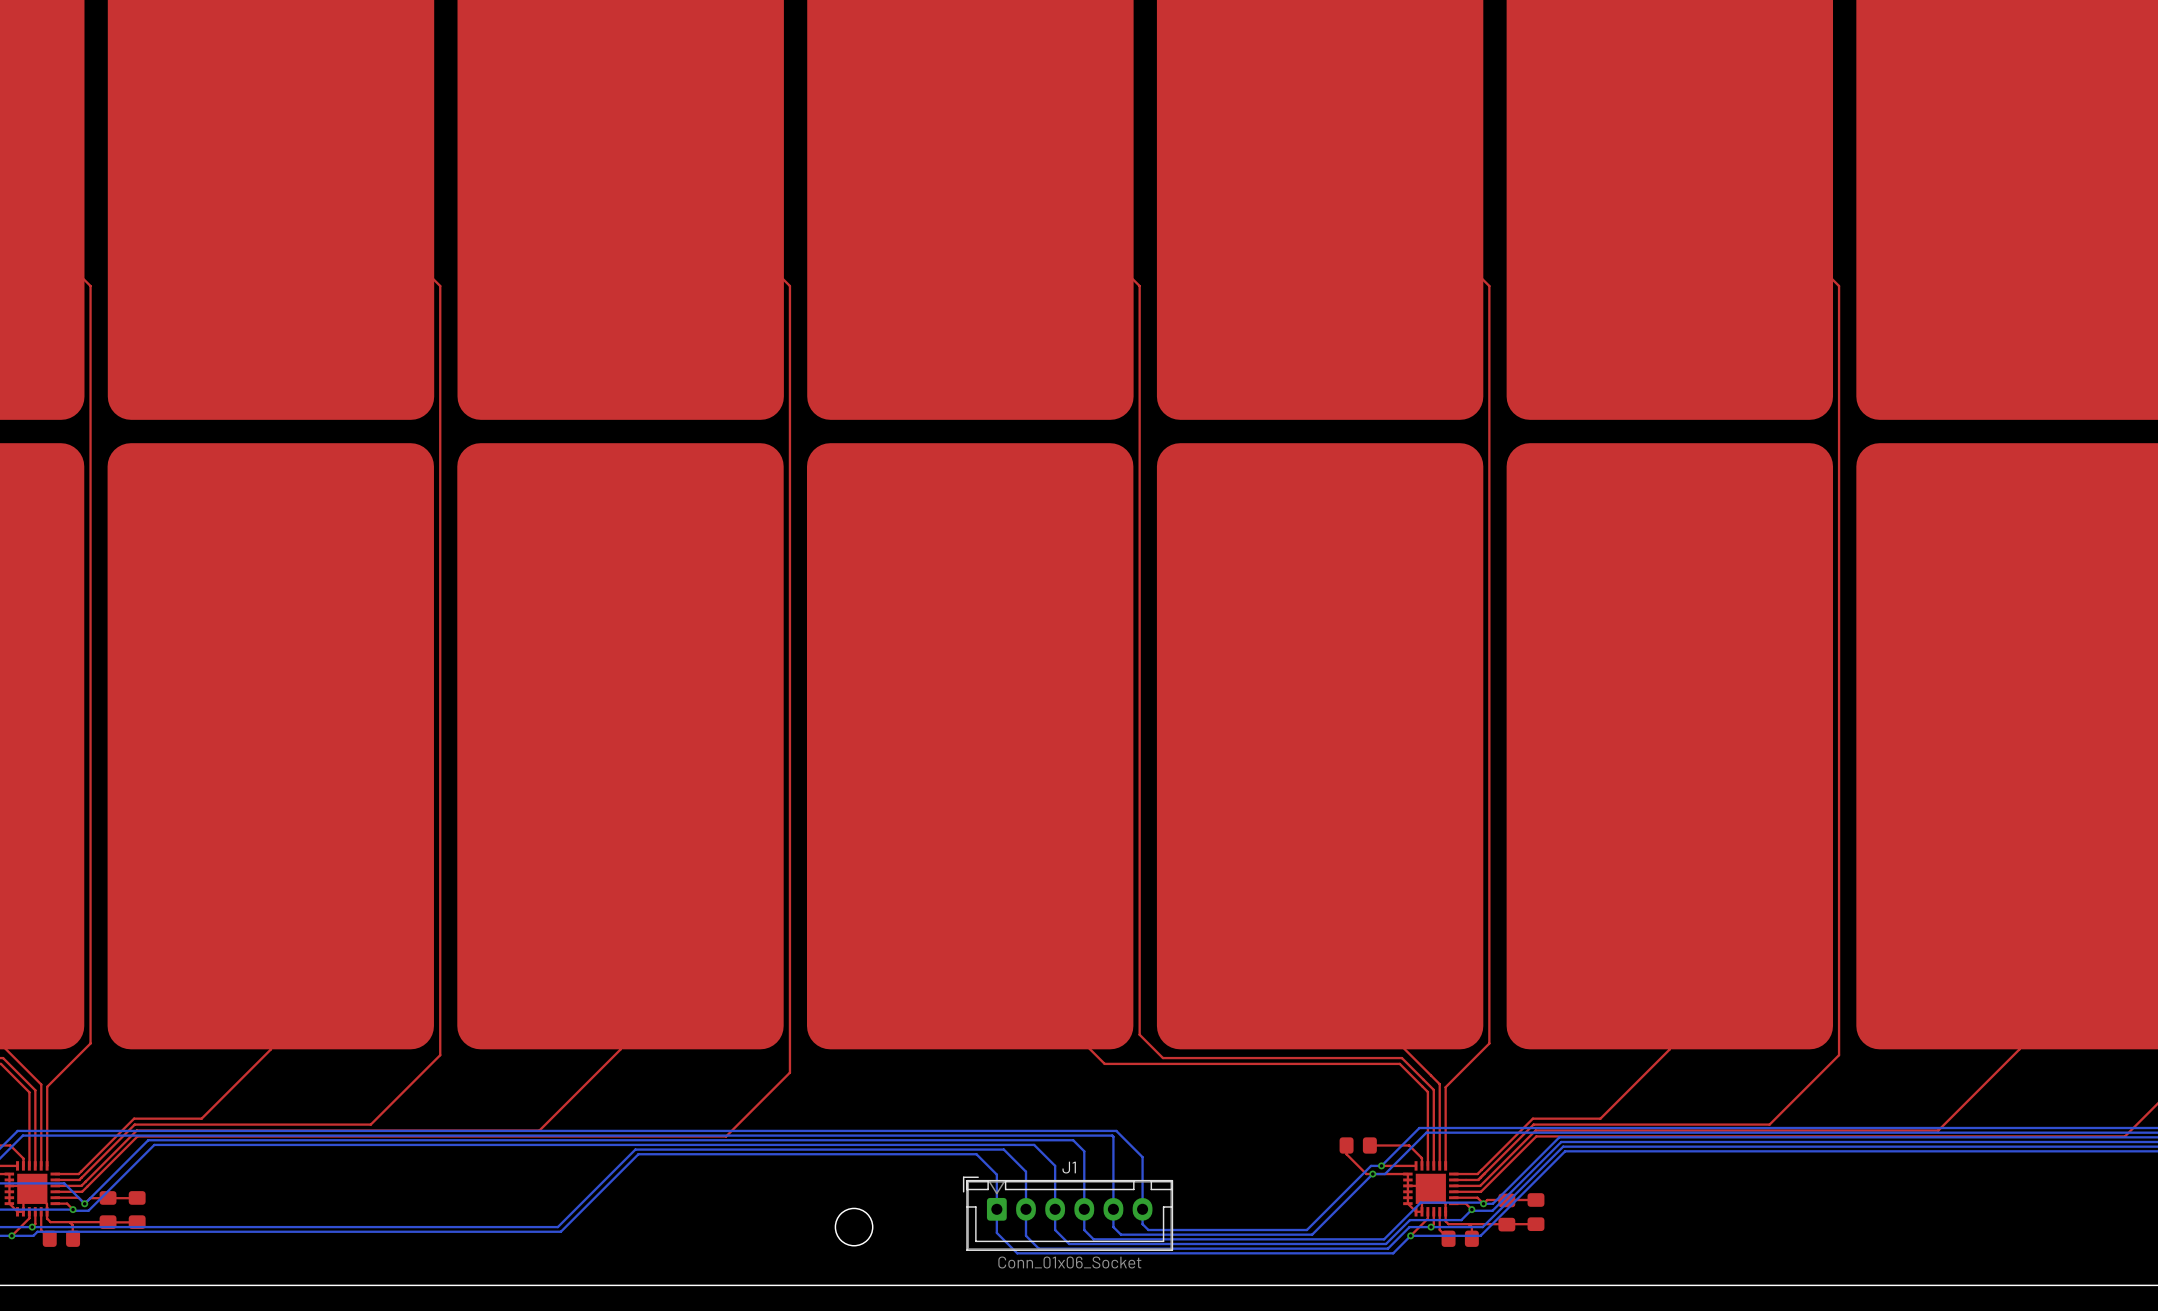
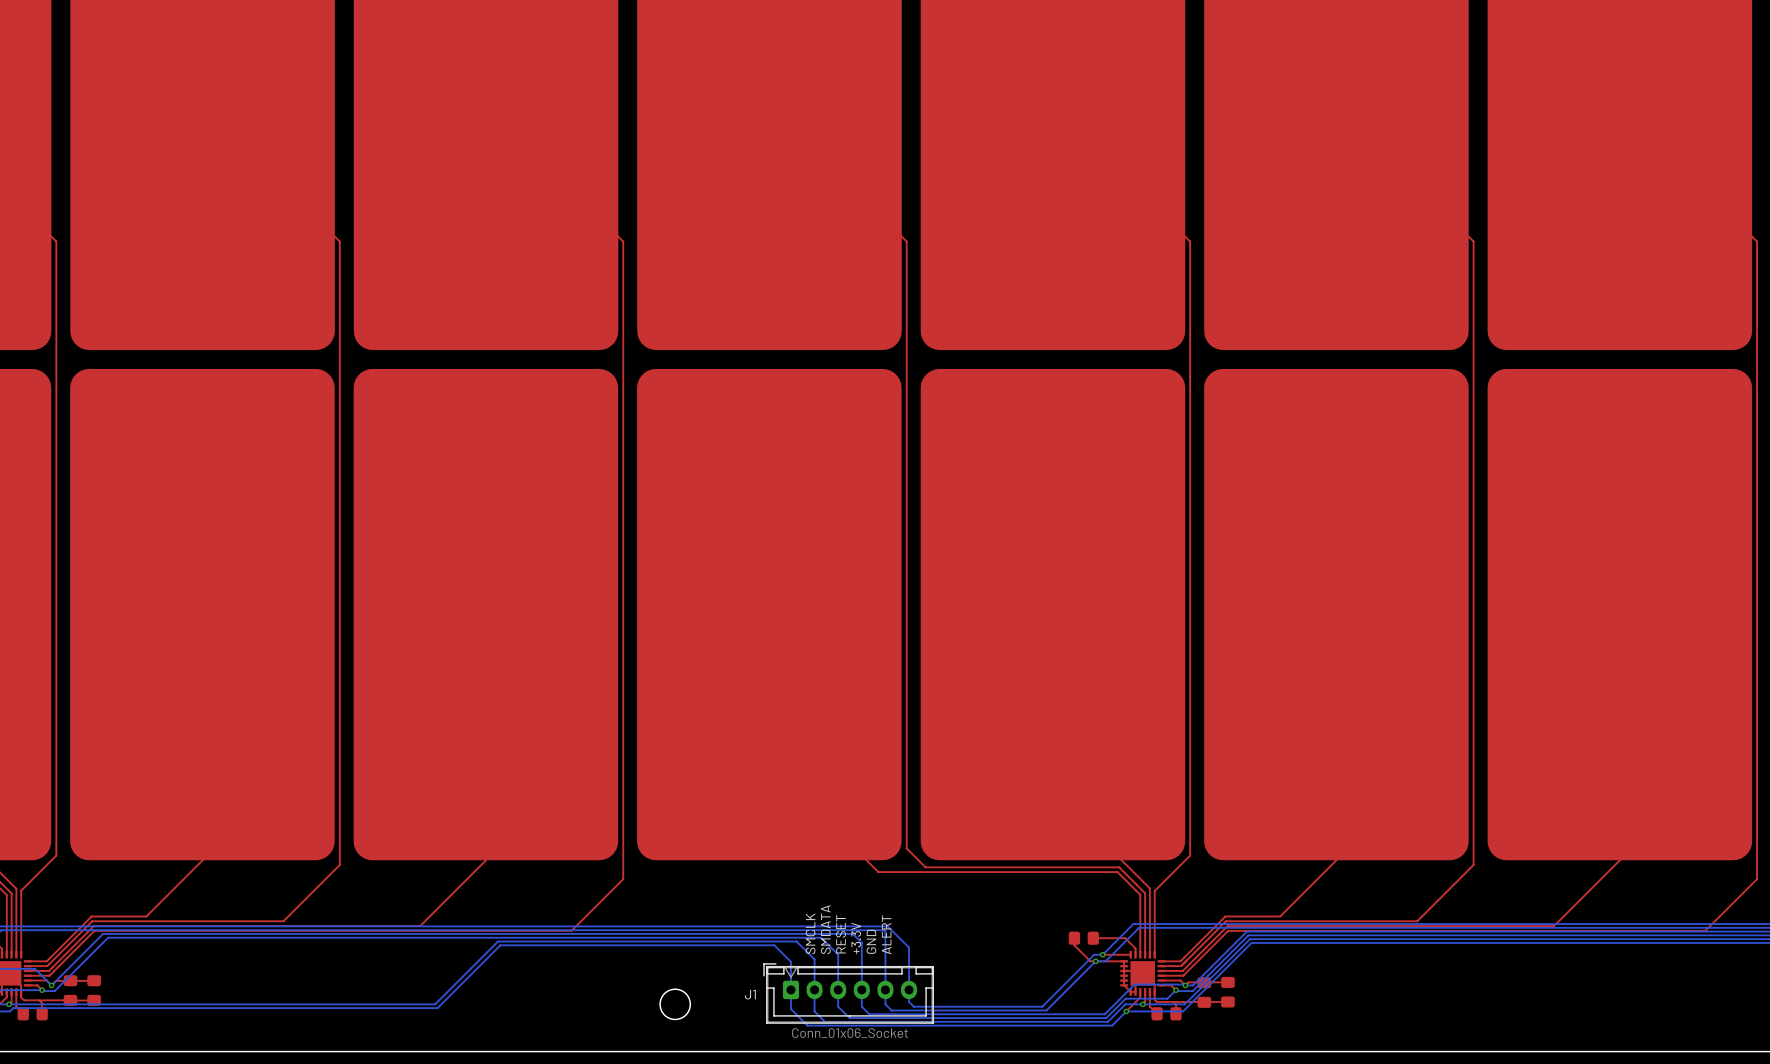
text: none -> SMDATA (825, 929)
text: none -> SMCLK (810, 933)
text: none -> RESET (841, 934)
text: none -> ALERT (886, 934)
text: none -> +3.3V (856, 938)
text: none -> GND (871, 941)
J1 name position: J1 (1069, 1167) -> J1 (750, 994)

